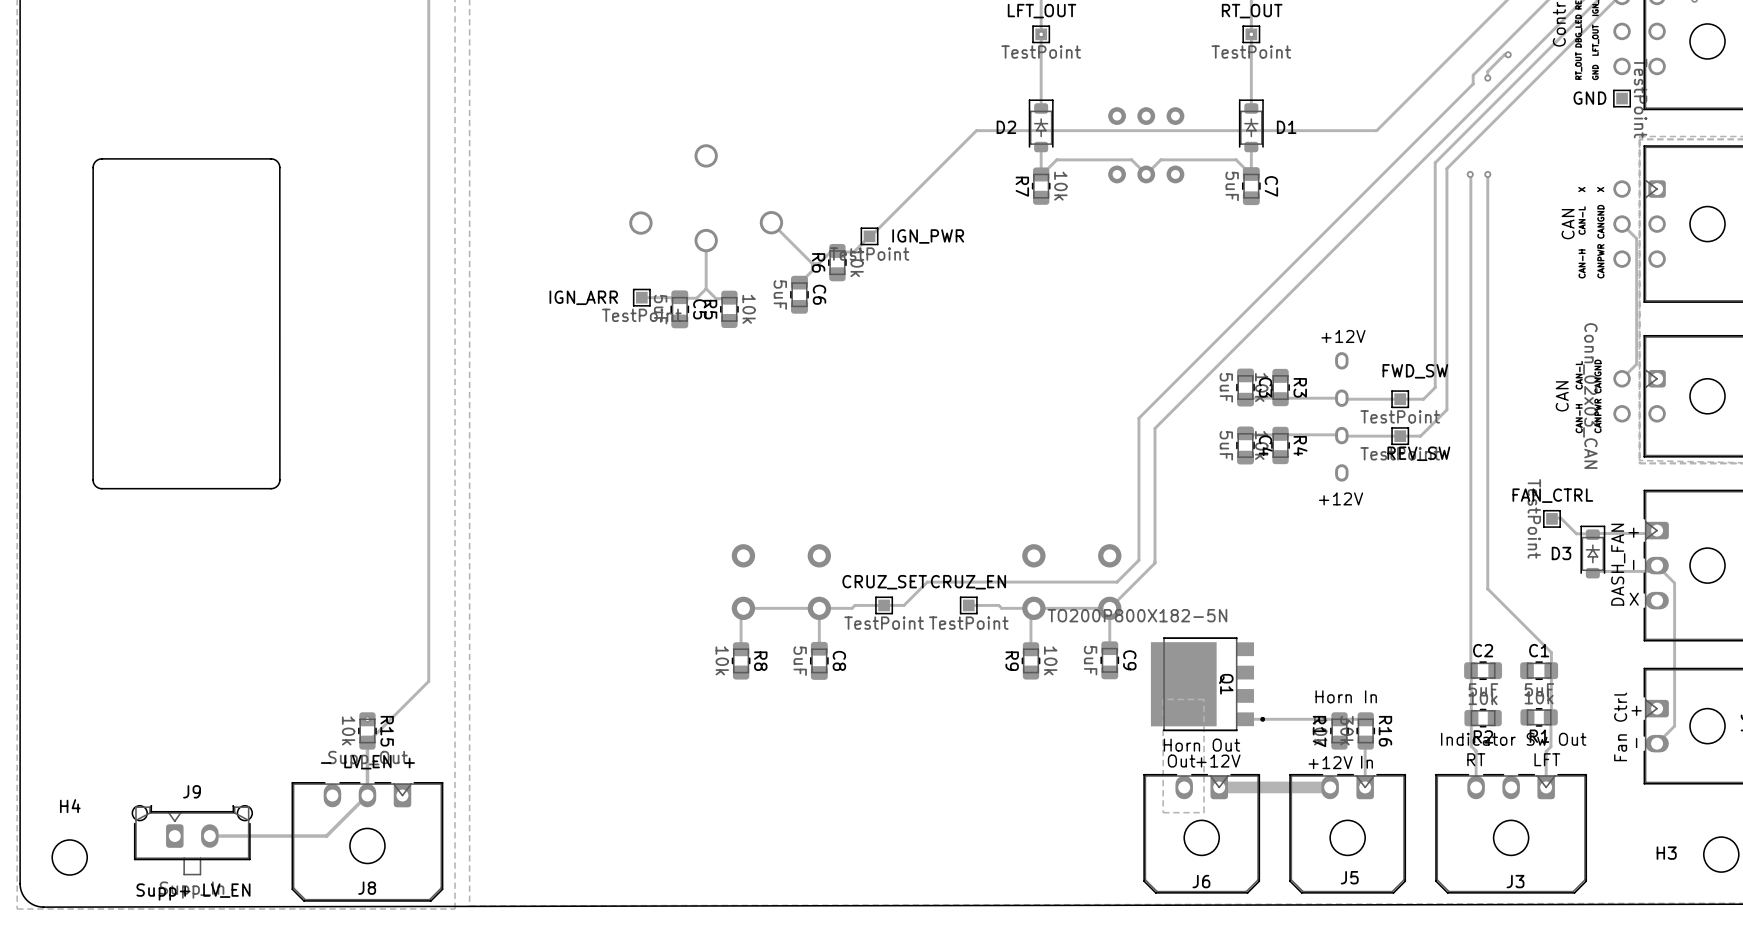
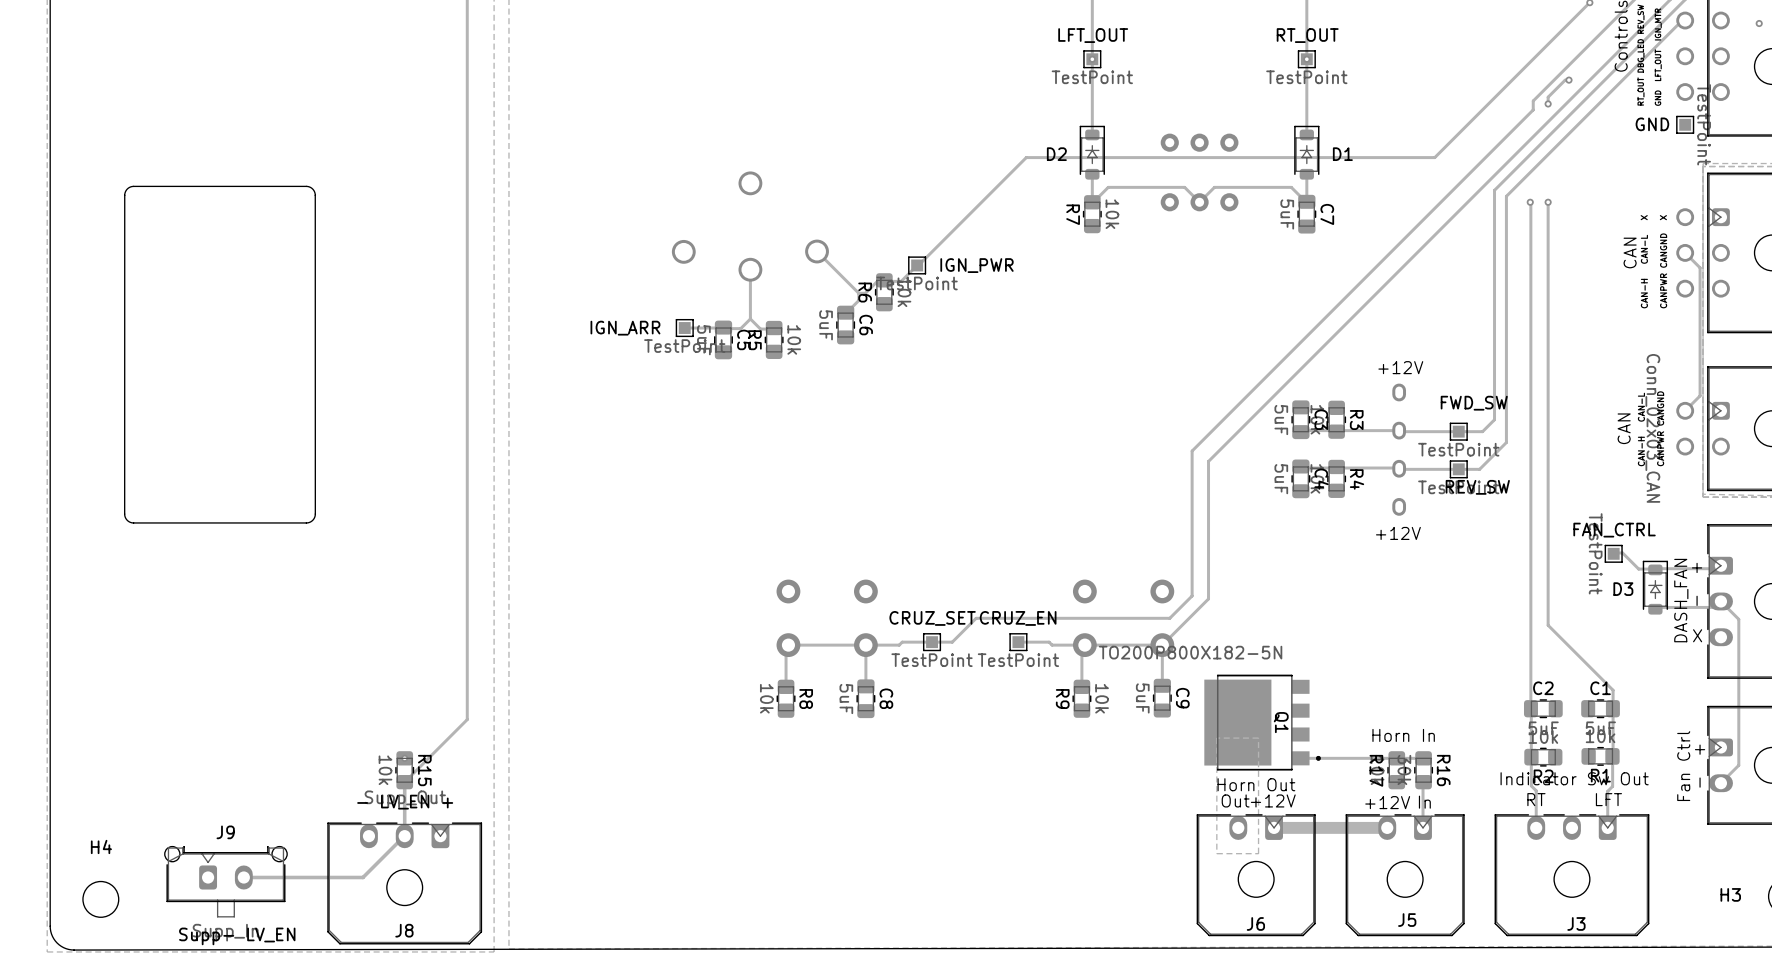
text: Supp+ LV_EN (193, 892) -> Supp- LV_EN (237, 936)

